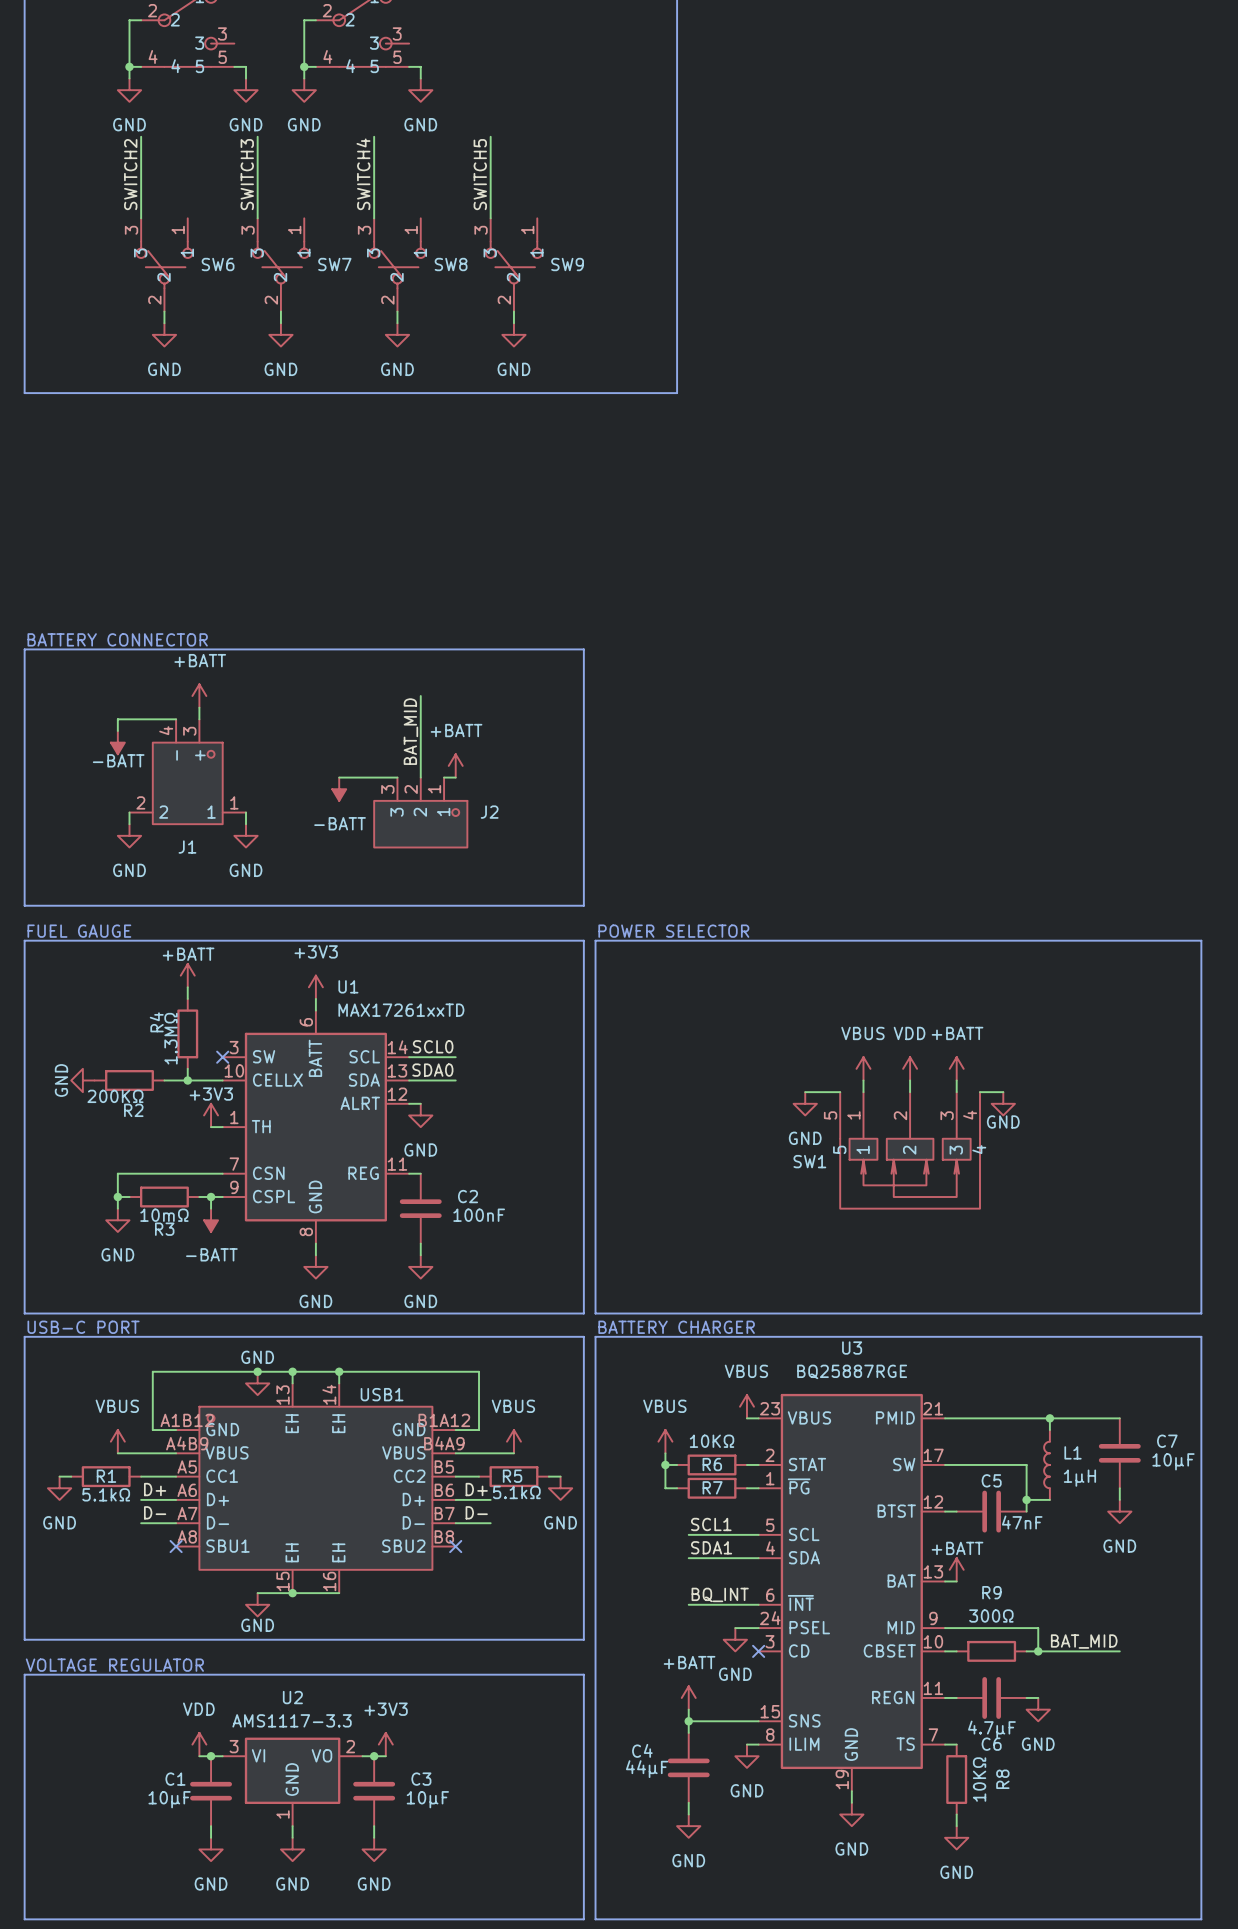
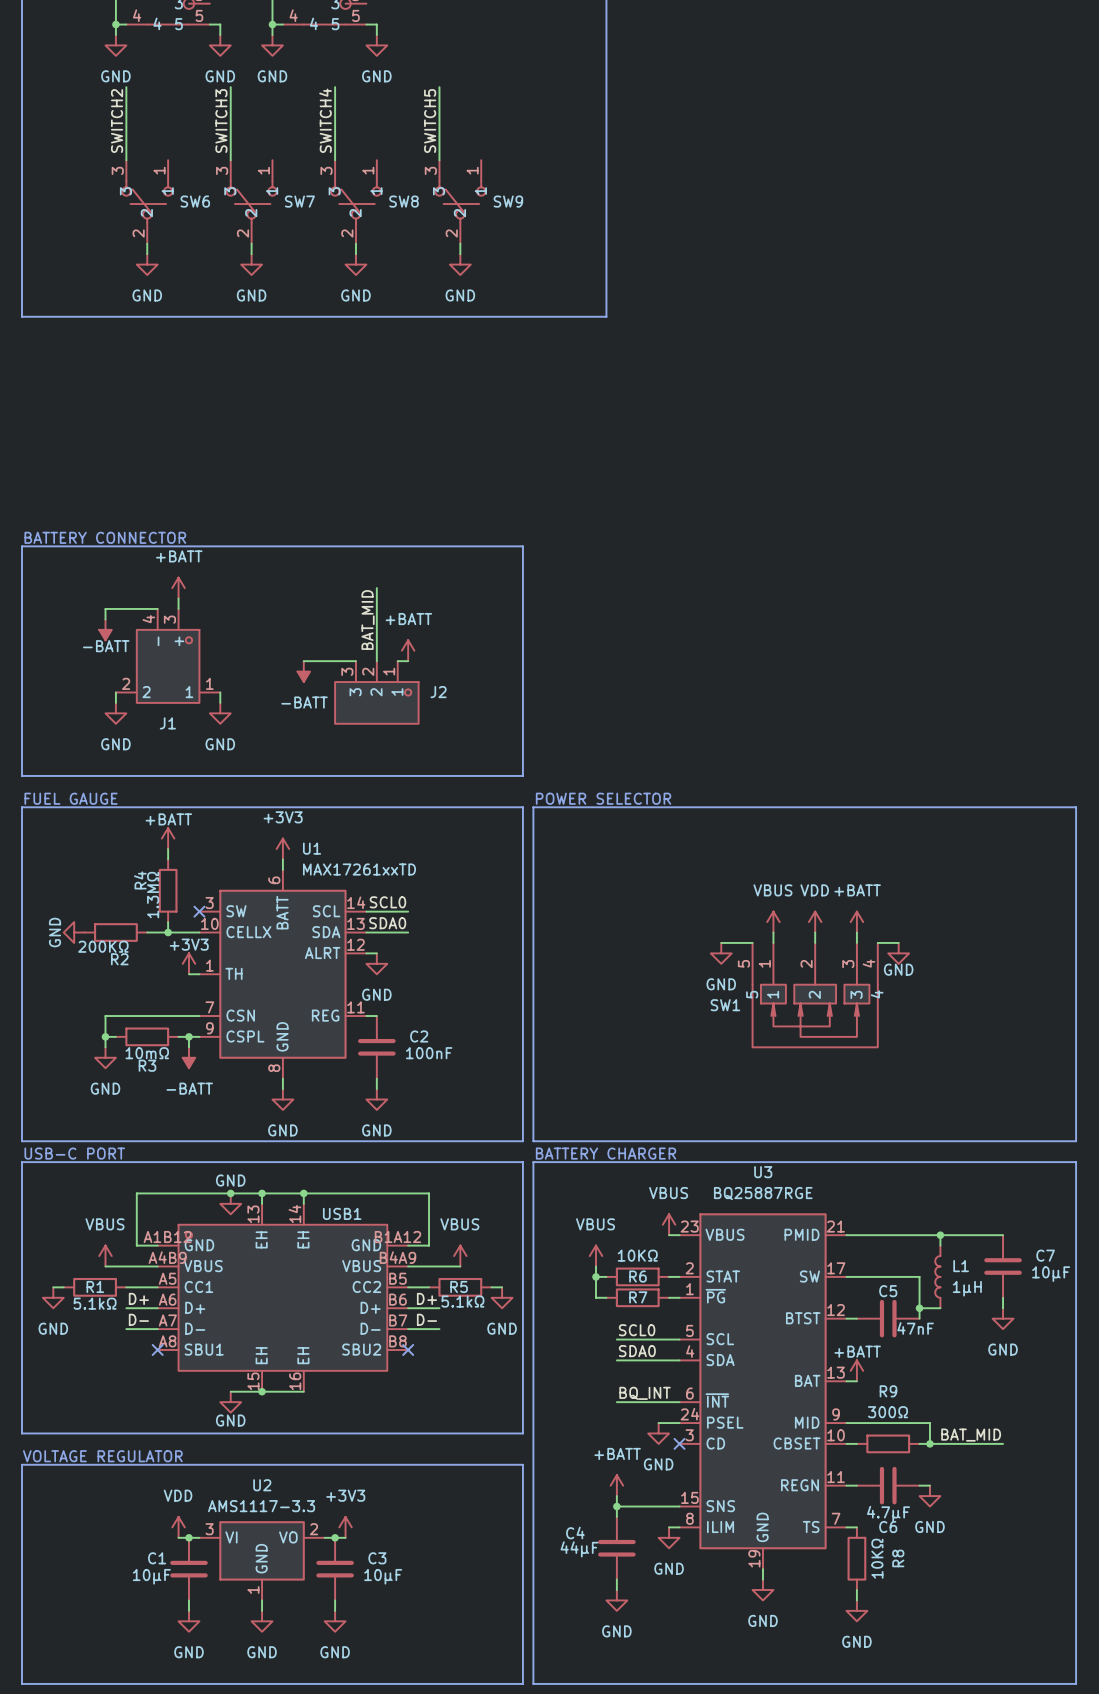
label: SCL1 (711, 1524) -> SCL0 (637, 1330)
label: SDA1 (711, 1547) -> SDA0 (637, 1351)

